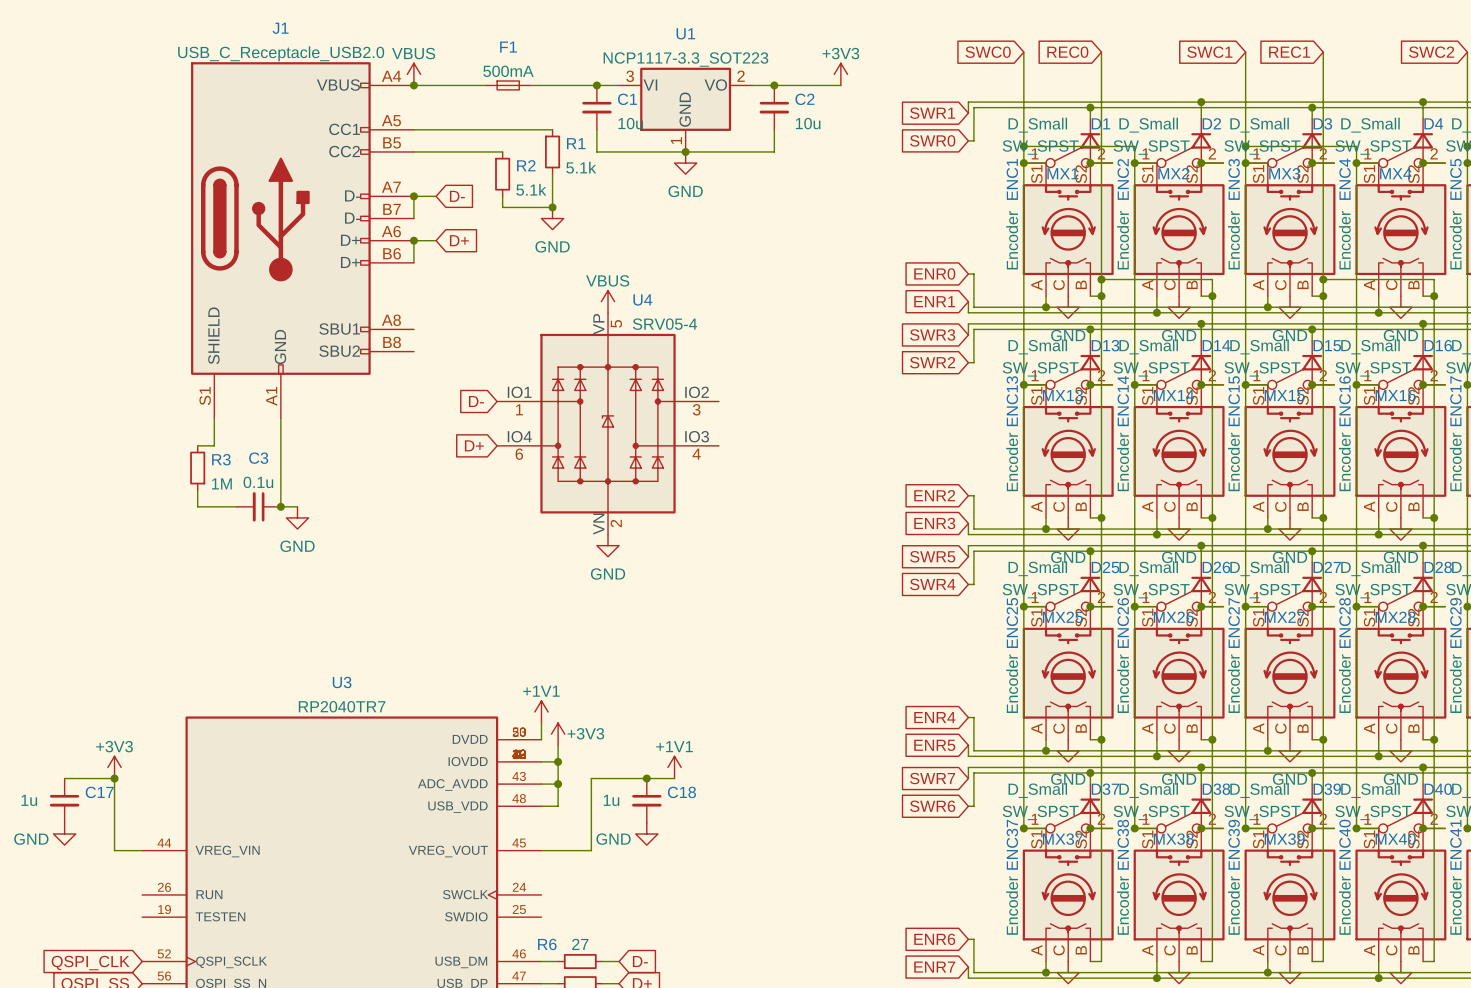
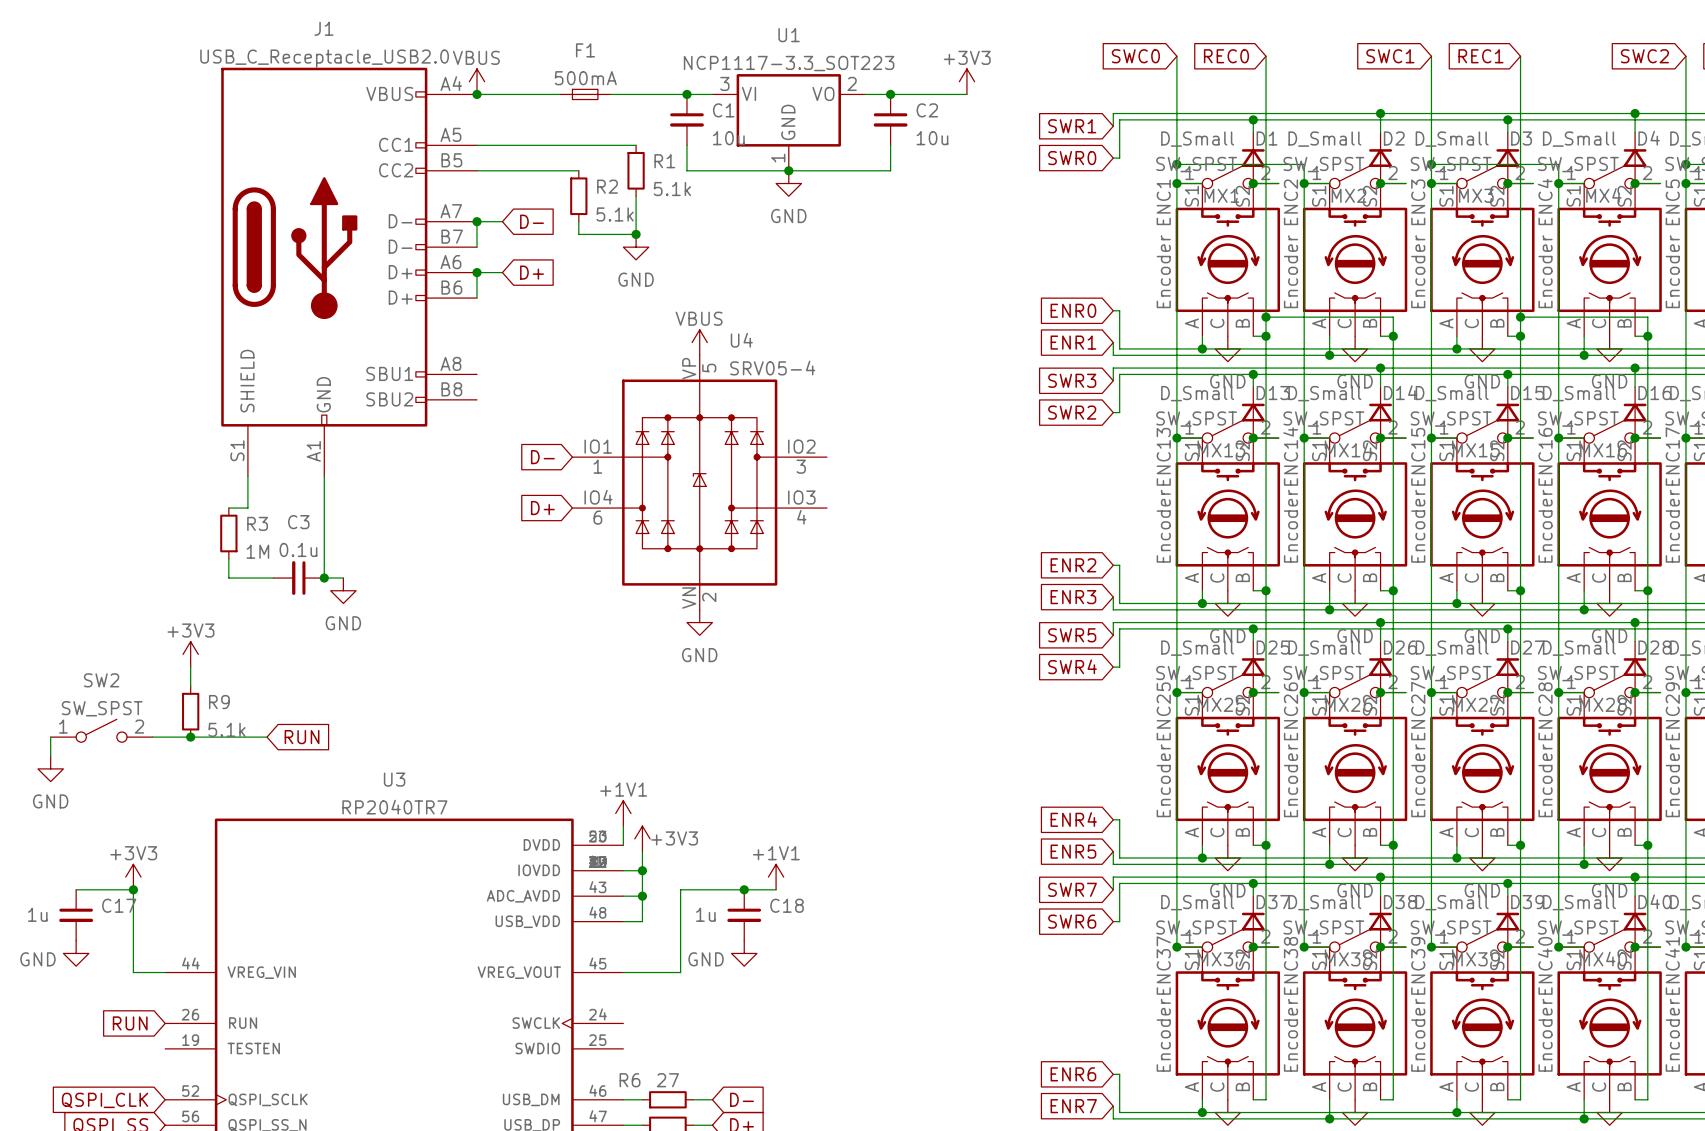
power symbol: none -> +3V3 (190, 654)
wire: none -> (190, 667) (190, 686)
R9: none -> 5.1k (190, 711)
SW2: none -> SW_SPST (101, 730)
wire: none -> (50, 737) (50, 756)
wire: none -> (152, 737) (267, 737)
junction: none -> (190, 737)
global label: none -> RUN (302, 737)
power symbol: none -> GND (50, 768)
global label: none -> RUN (130, 1023)

